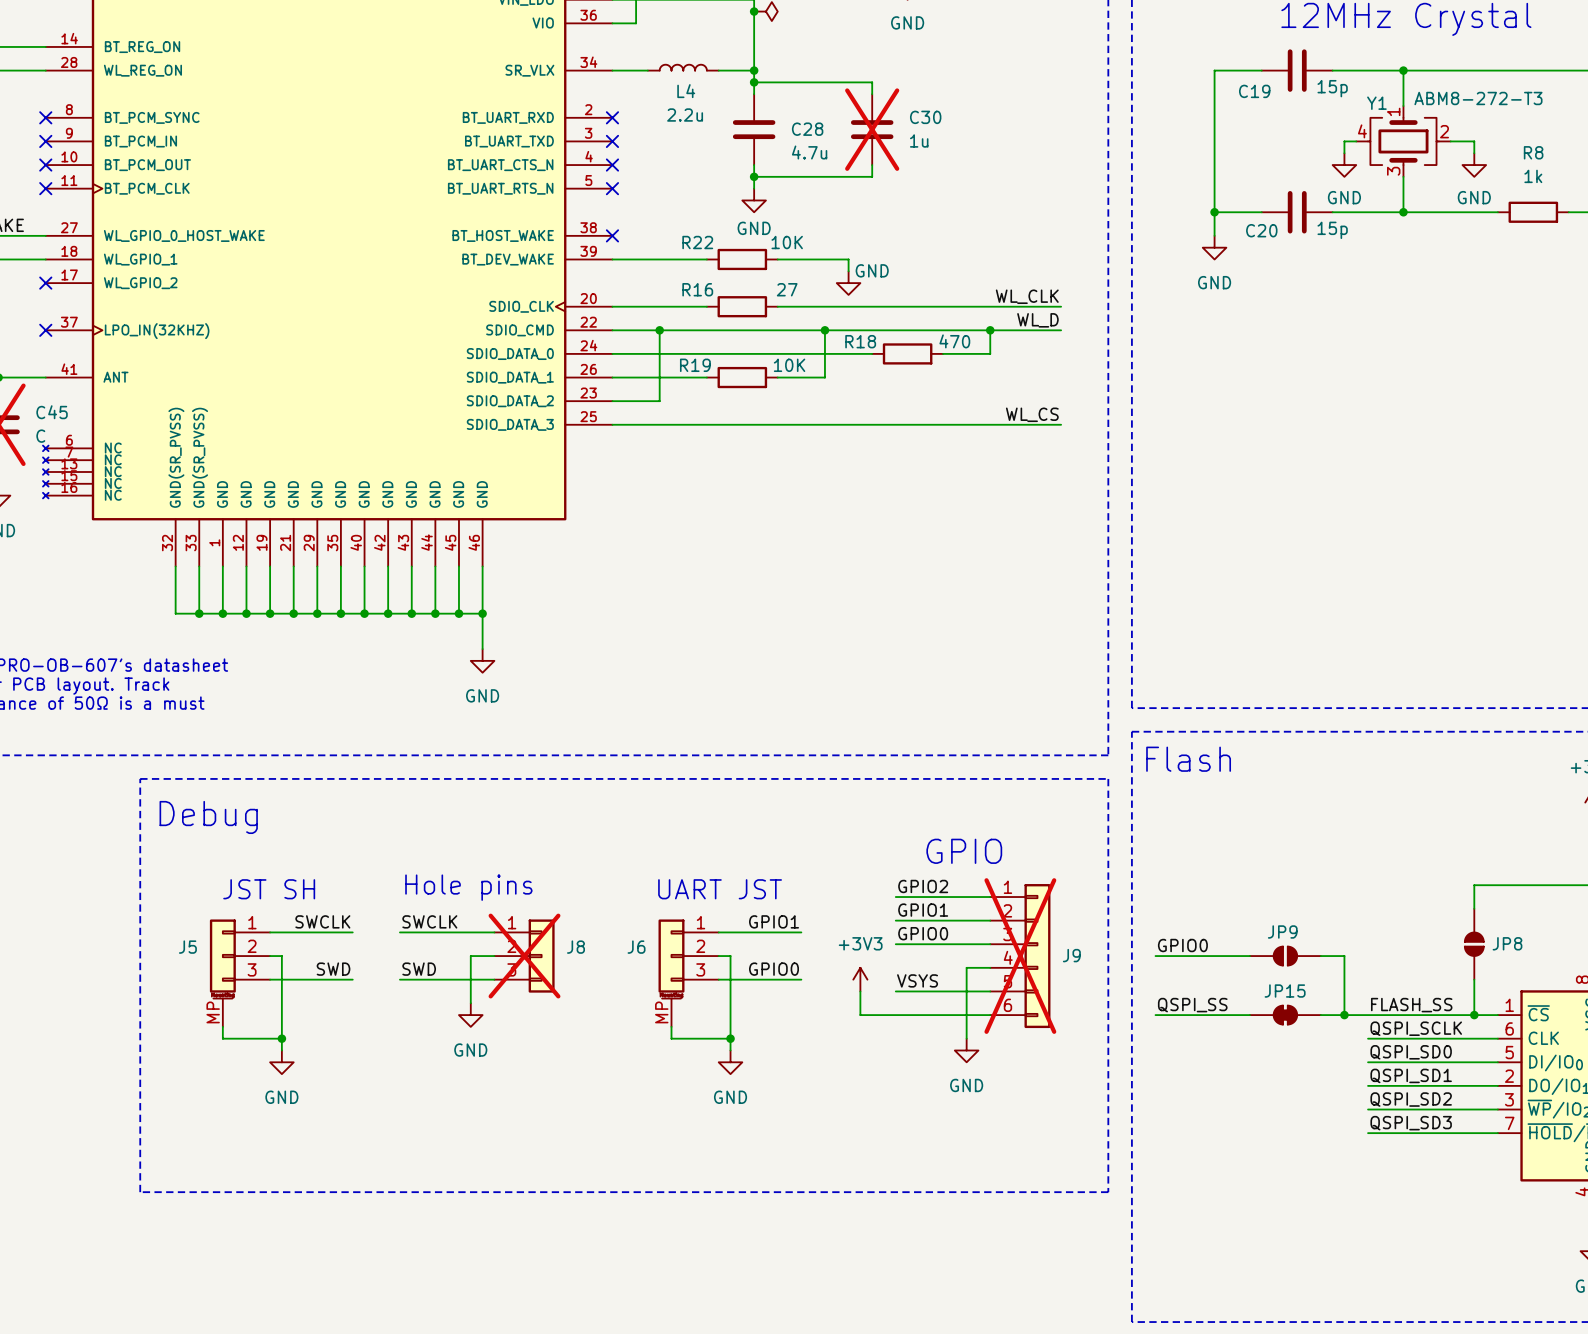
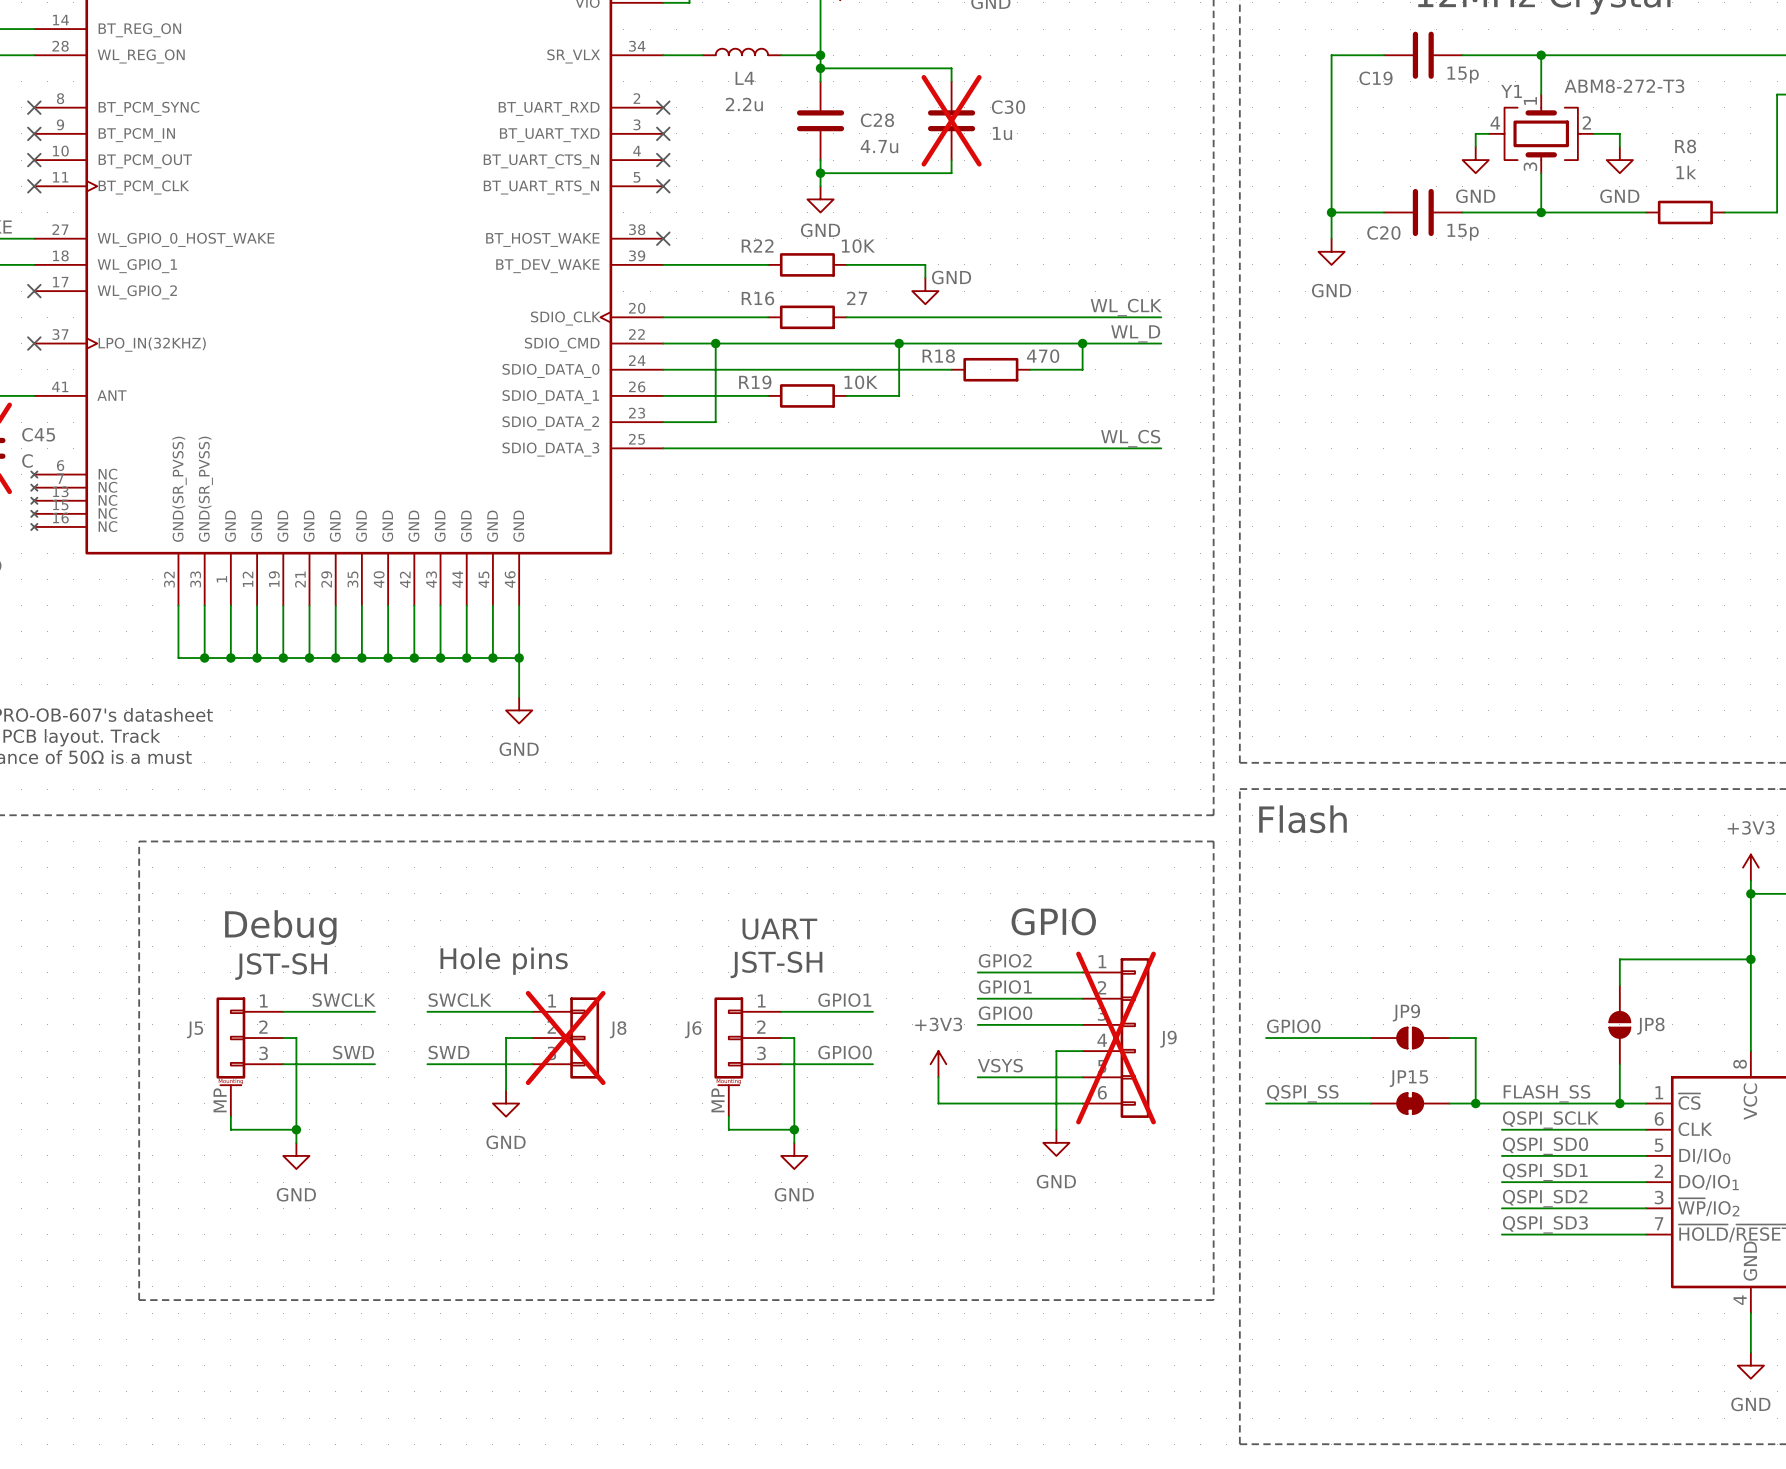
text position: Debug (208, 817) -> Debug (280, 927)
text: none -> UART (779, 929)
text: JST SH (269, 889) -> JST-SH (281, 966)
text: UART JST (720, 889) -> JST-SH (776, 964)

